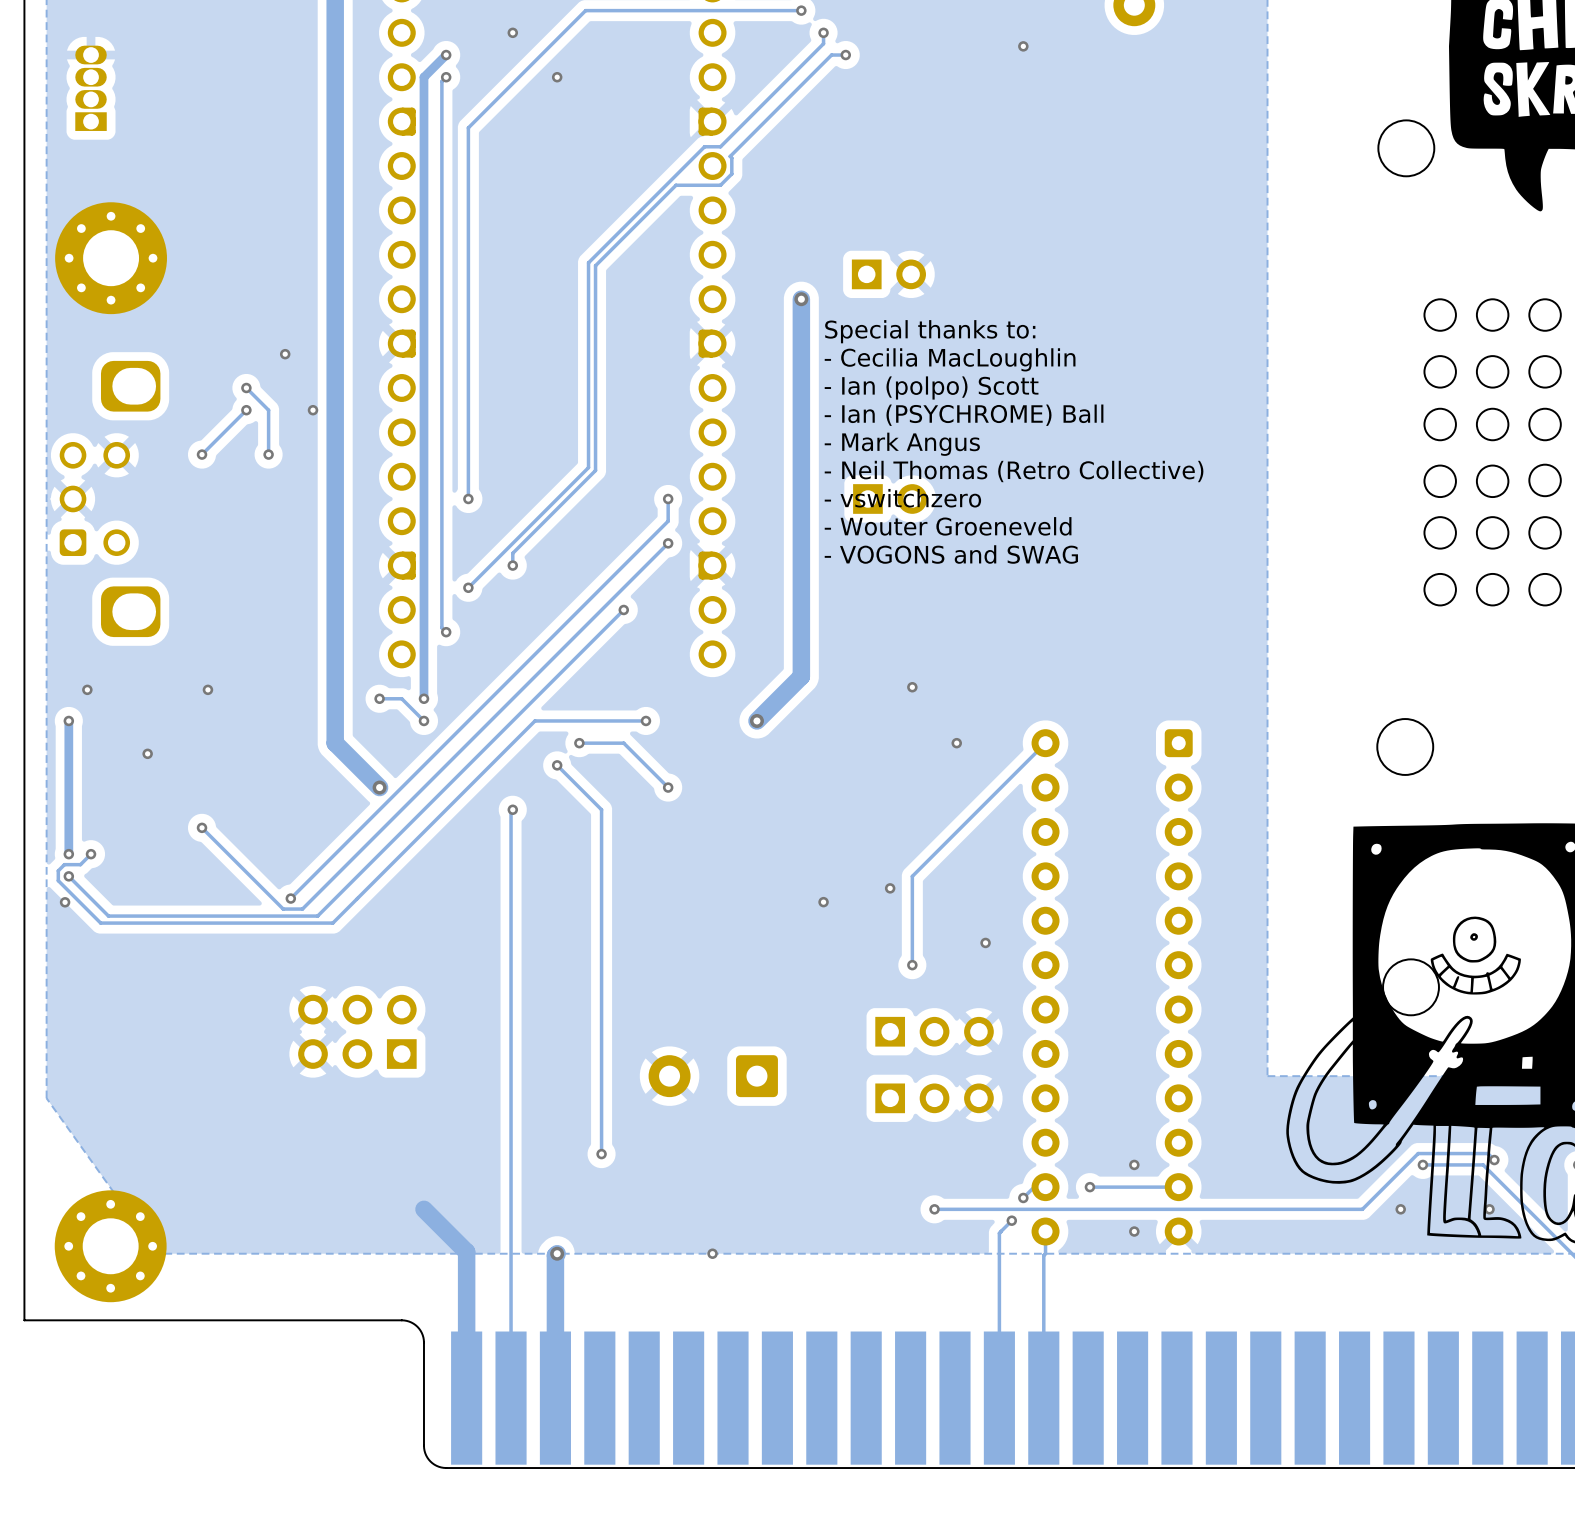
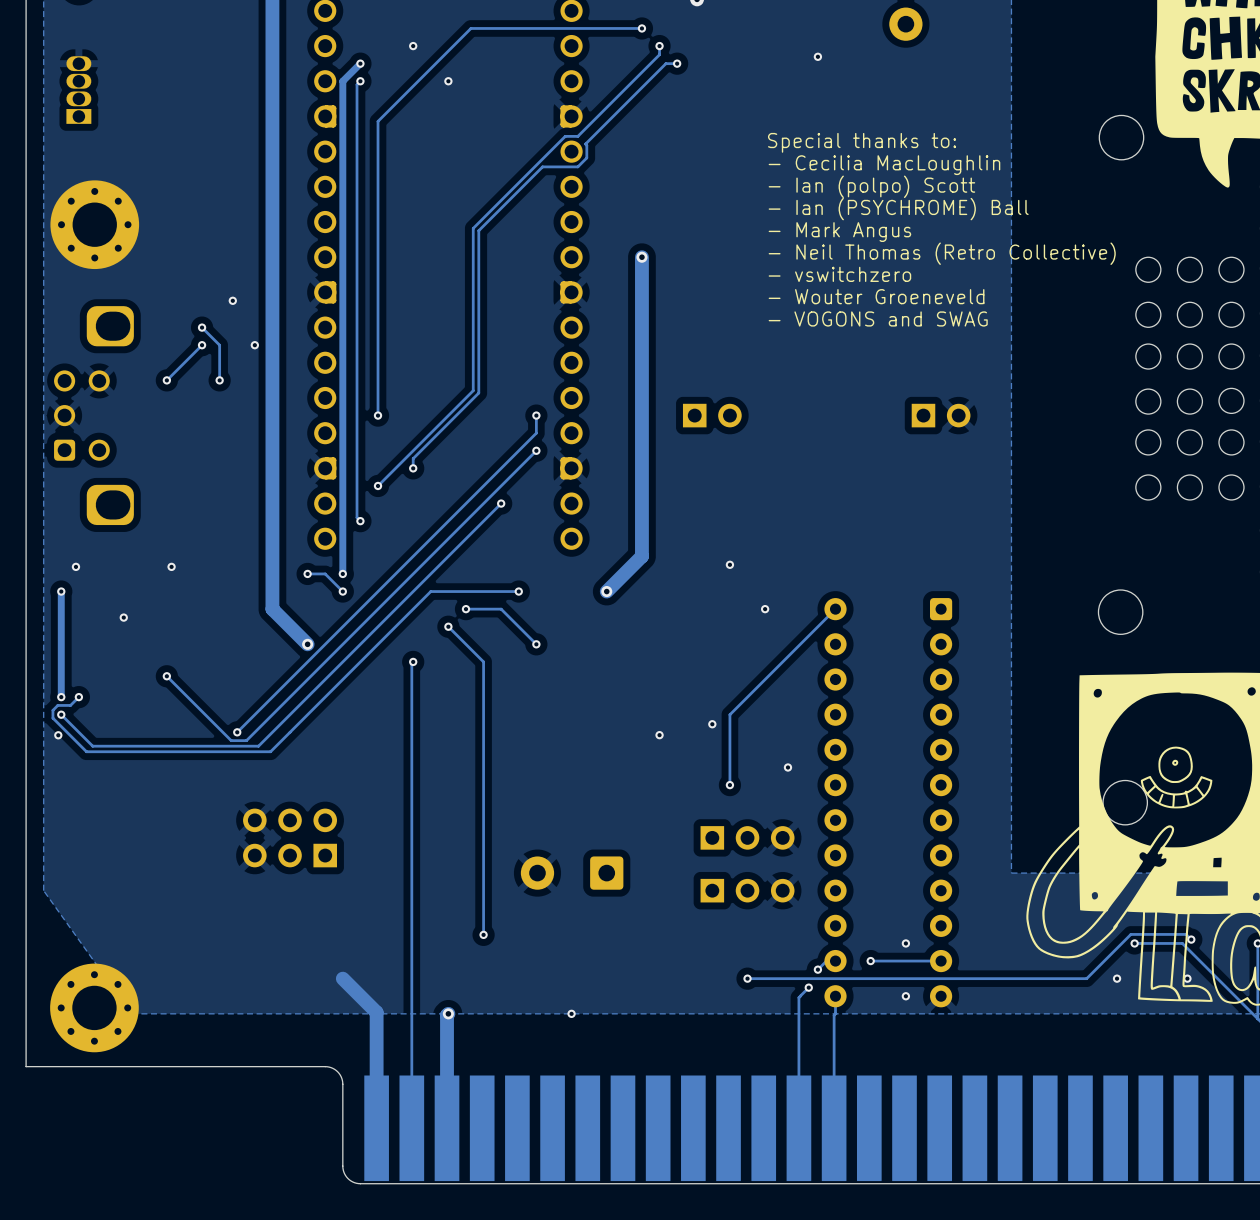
part position: (888, 274) -> (941, 415)
text position: Special thanks to: (930, 331) -> Special thanks to: (862, 142)
text position: - Cecilia MacLoughlin (950, 359) -> - Cecilia MacLoughlin (884, 165)
text position: - Ian (polpo) Scott (931, 387) -> - Ian (polpo) Scott (871, 186)
text position: - Ian (PSYCHROME) Ball (964, 415) -> - Ian (PSYCHROME) Ball (898, 209)
text position: - Mark Angus (902, 444) -> - Mark Angus (839, 232)
text position: - Neil Thomas (Retro Collective) (1014, 471) -> - Neil Thomas (Retro Collective) (942, 253)
text position: - vswitchzero (902, 498) -> - vswitchzero (839, 274)
text position: - Wouter Groeneveld (948, 526) -> - Wouter Groeneveld (876, 296)
text position: - VOGONS and SWAG (951, 554) -> - VOGONS and SWAG (878, 318)

